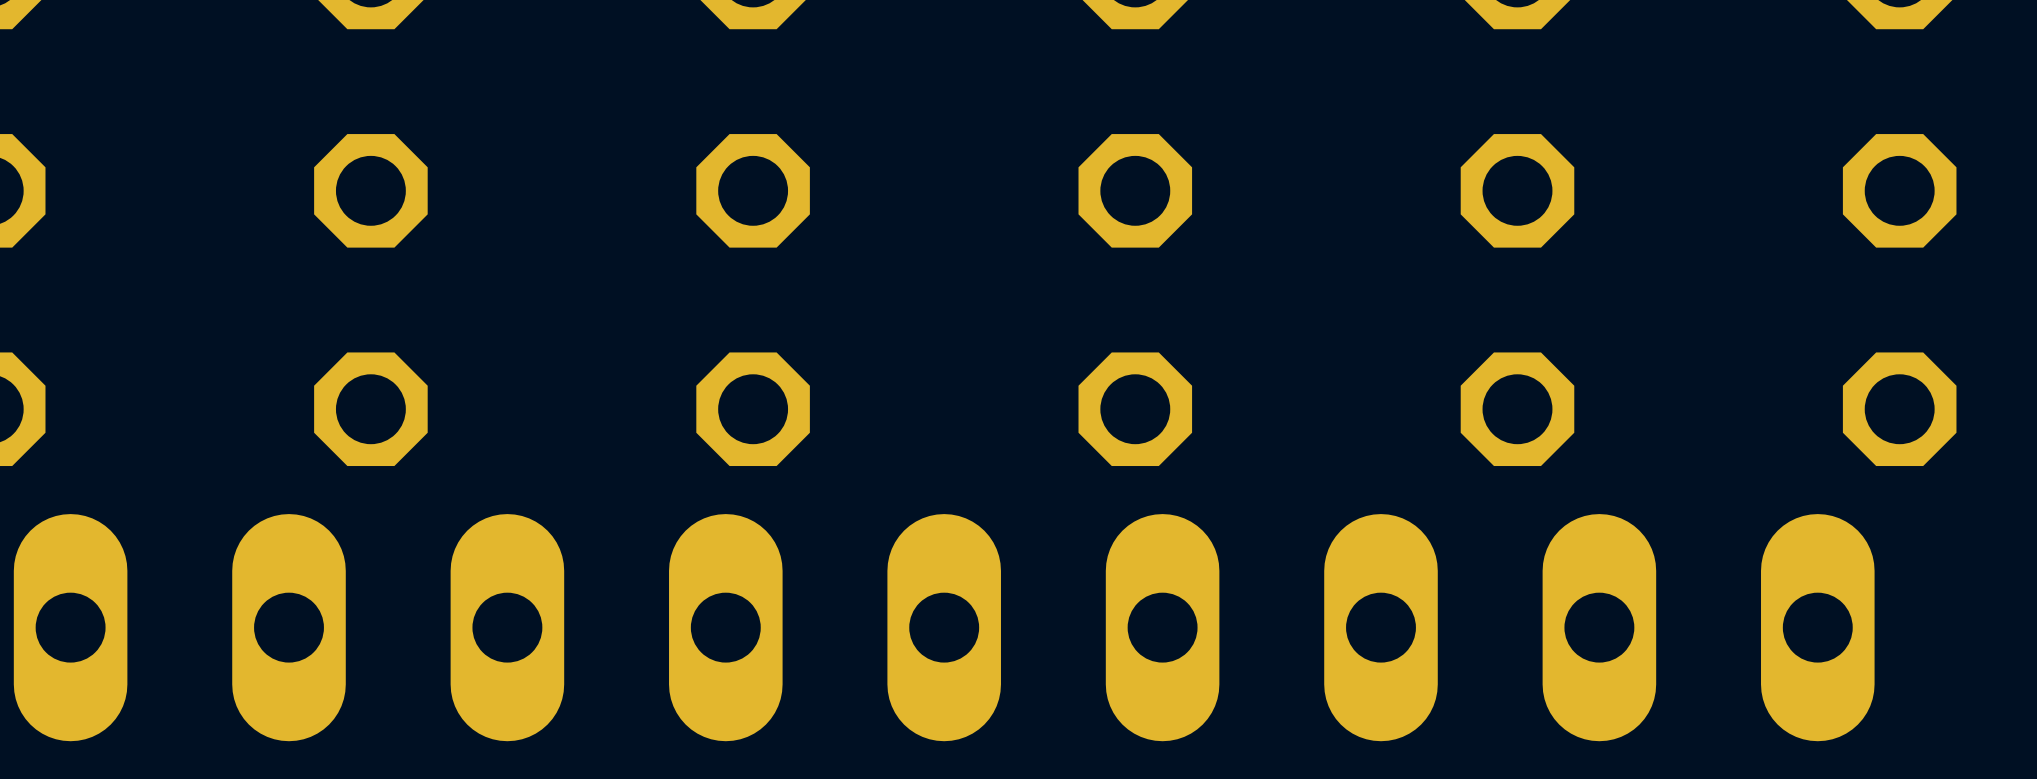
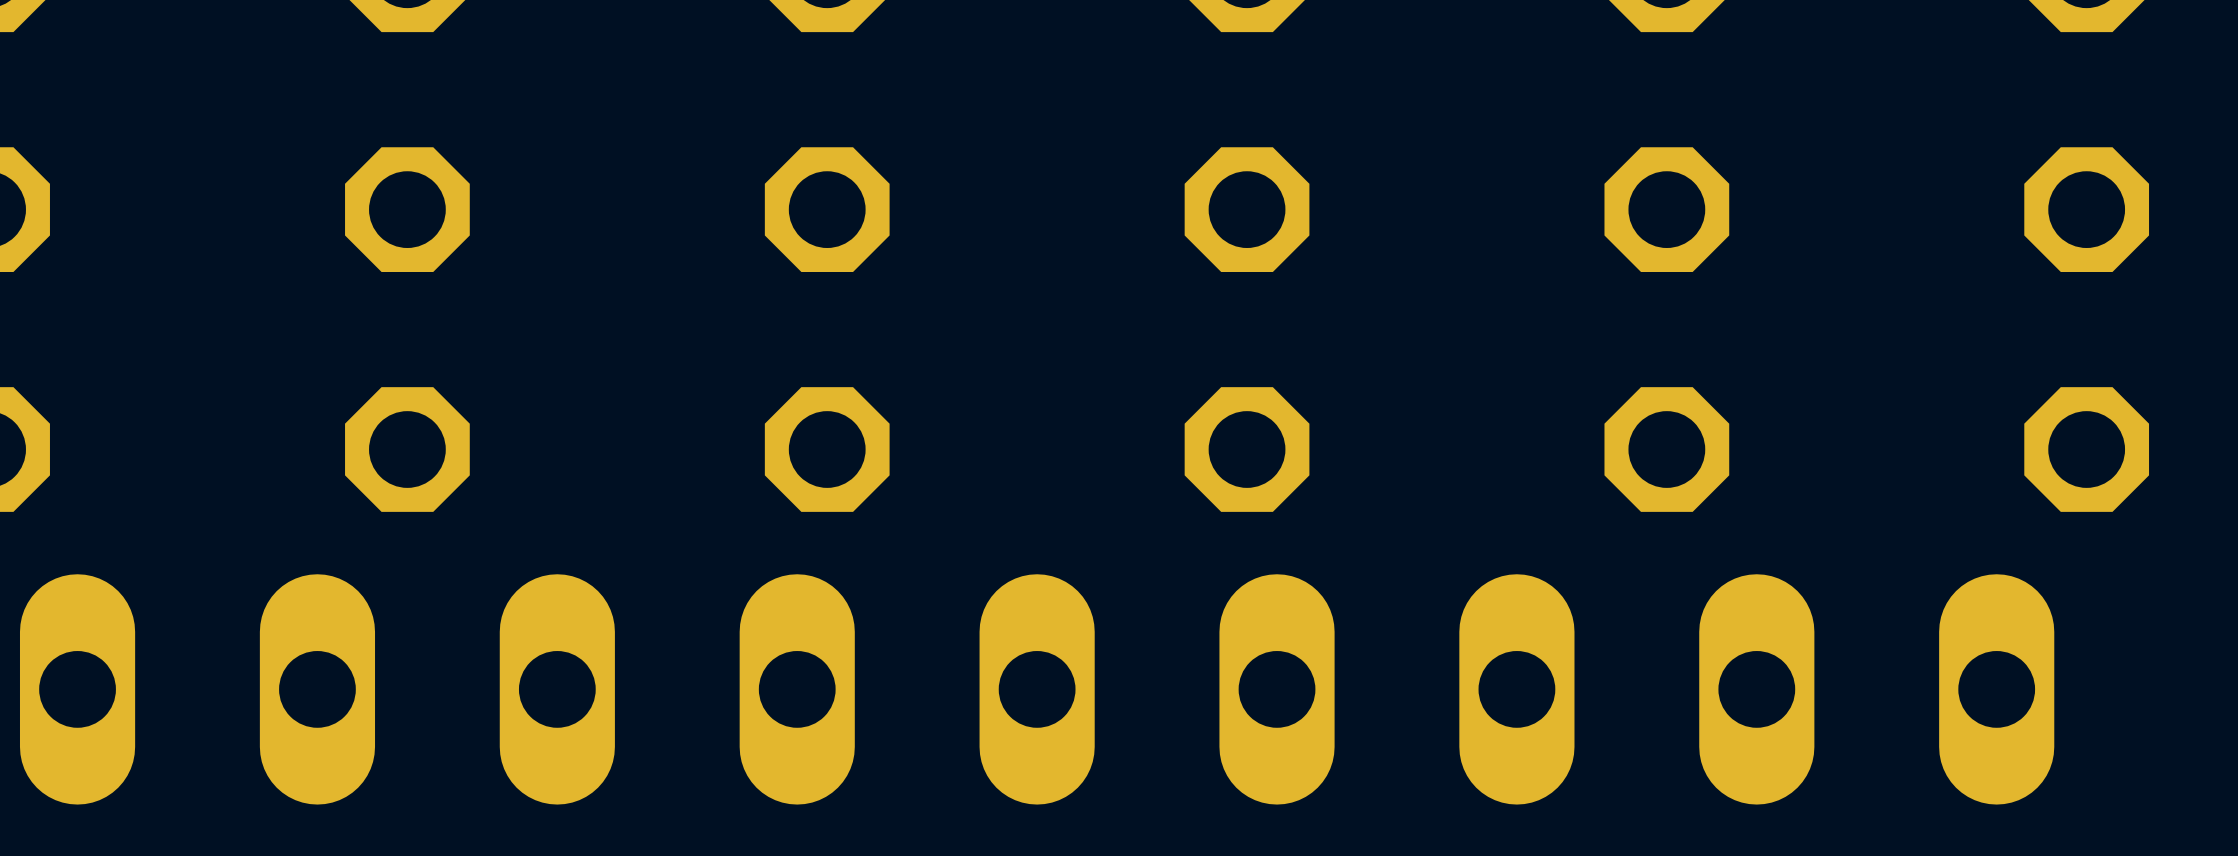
part footprint: [13, 514, 1875, 742] -> [19, 574, 2055, 805]

